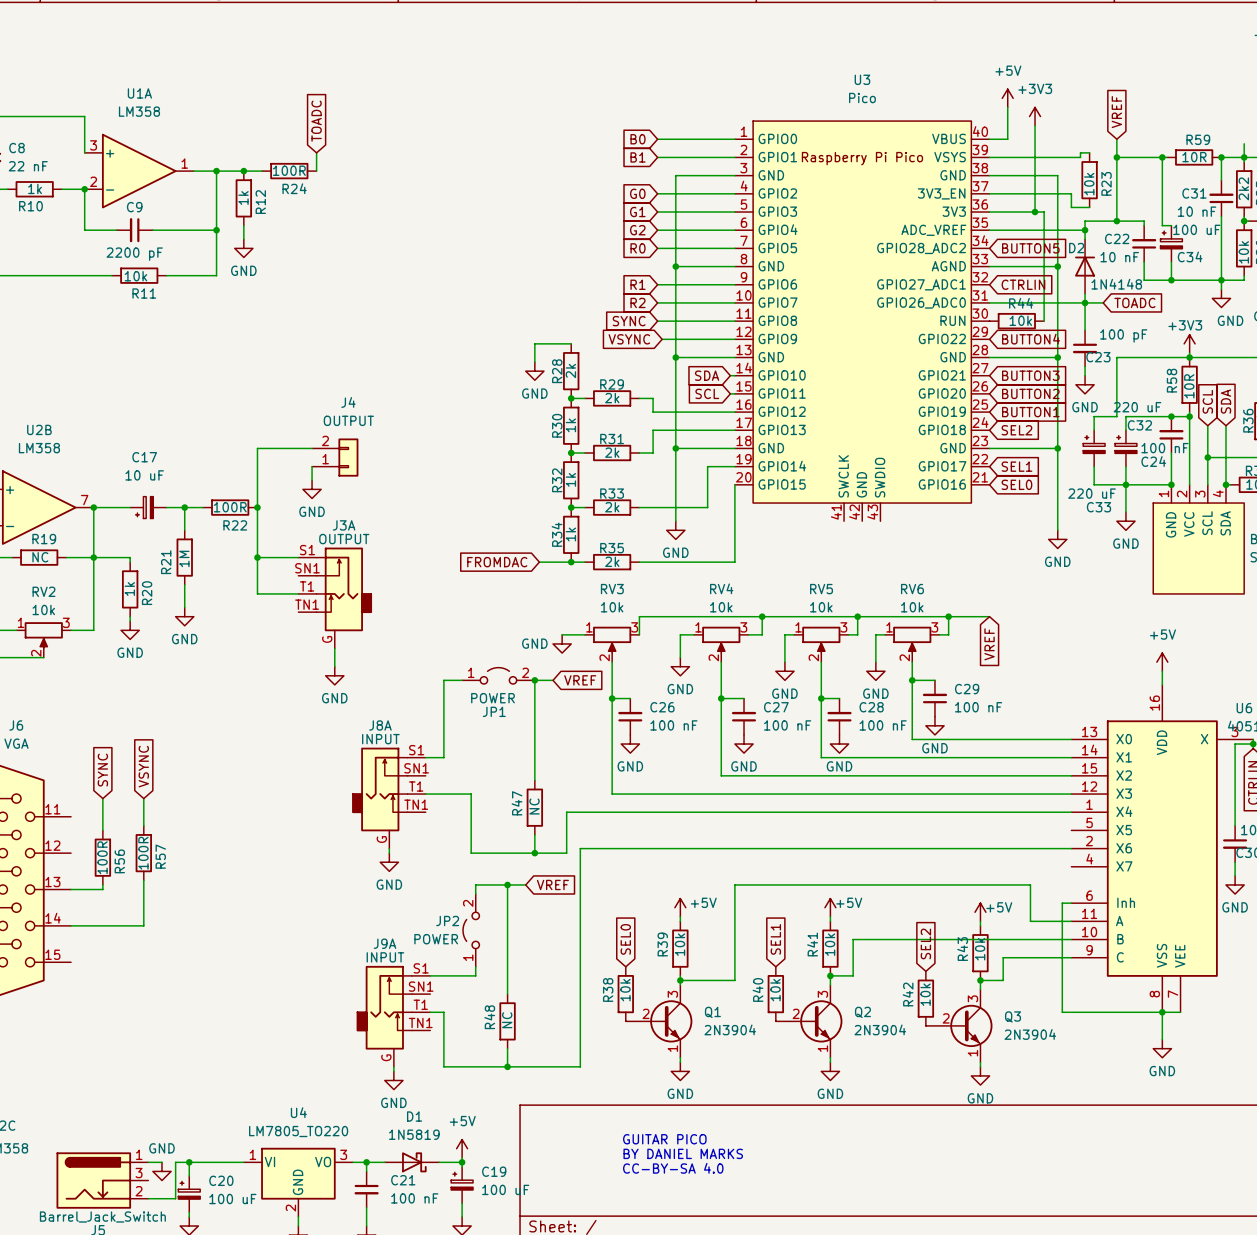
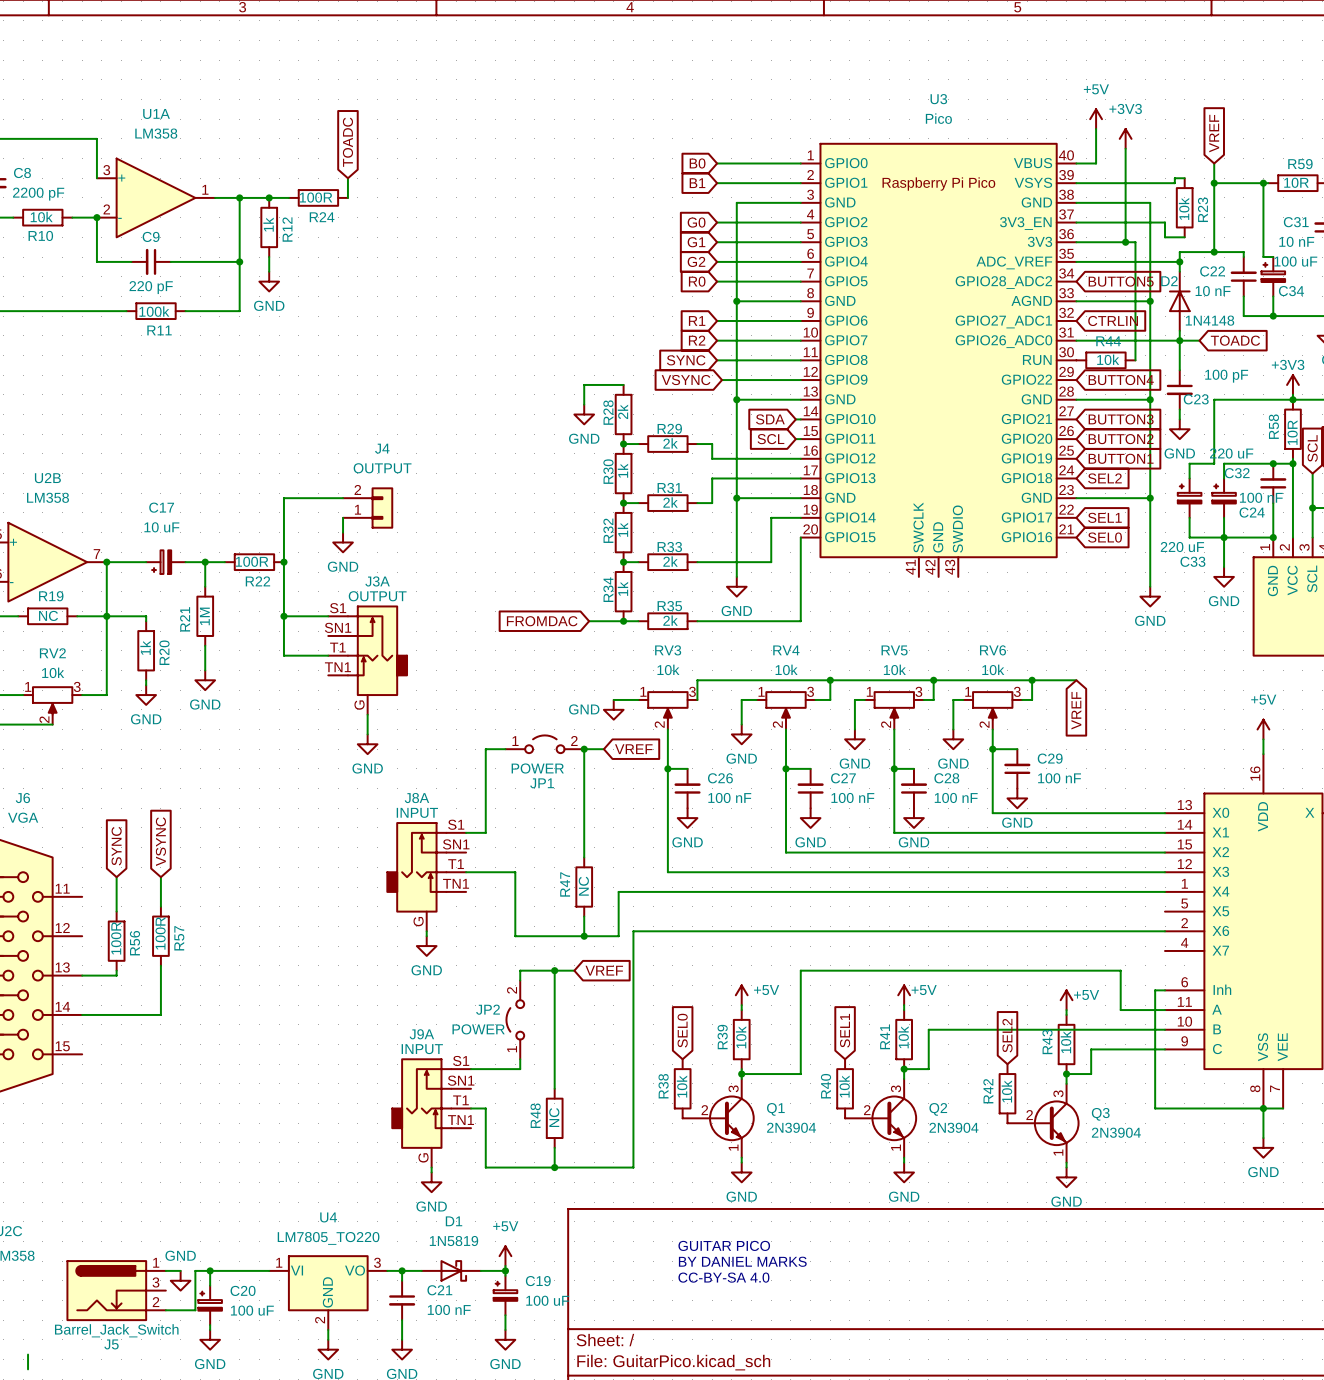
C8 value: 22 nF (28, 166) -> 2200 pF (38, 194)
R10 value: 1k (35, 188) -> 10k (41, 217)
C9 value: 2200 pF (134, 254) -> 220 pF (151, 287)
R11 value: 10k (135, 276) -> 100k (154, 311)

